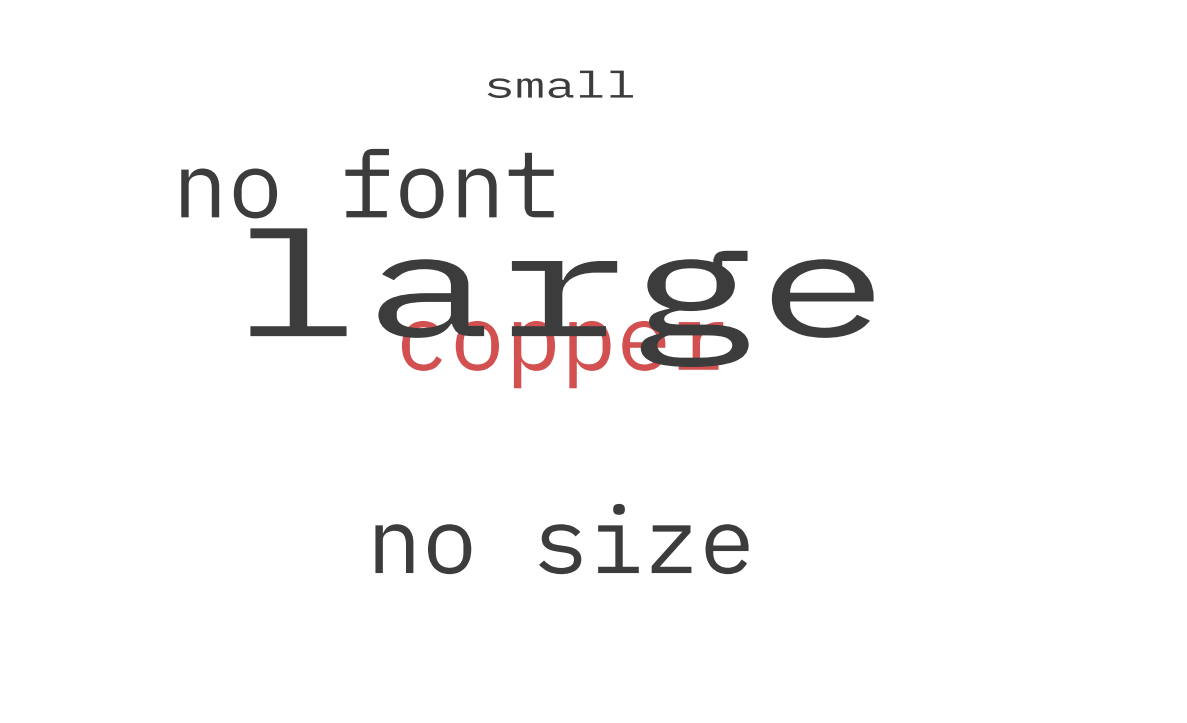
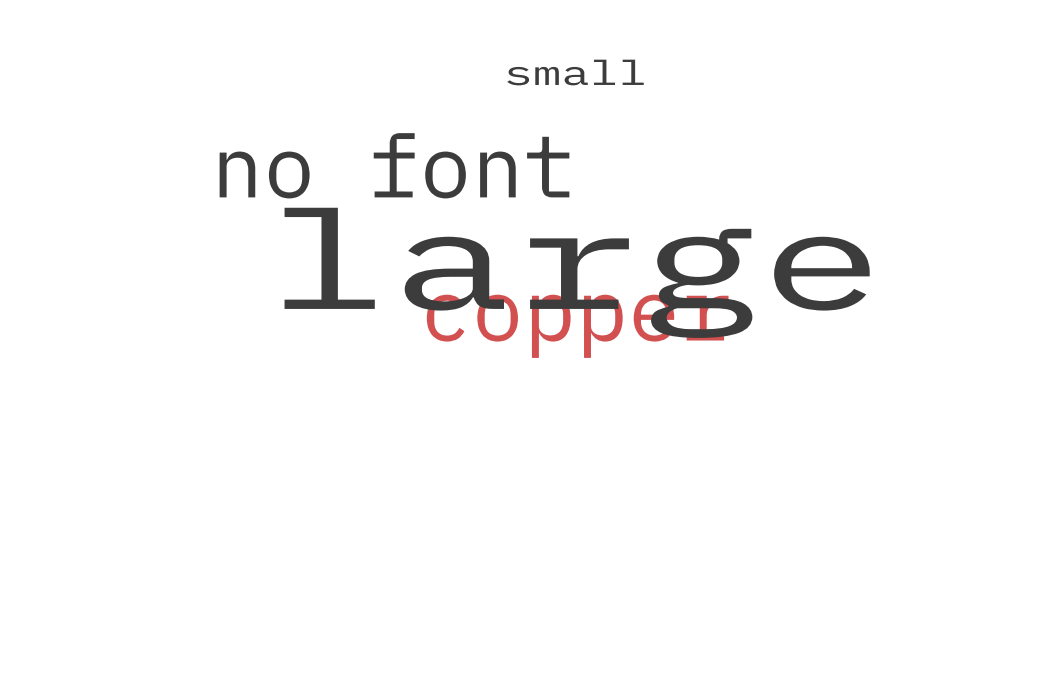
text: no size (562, 539) -> none

